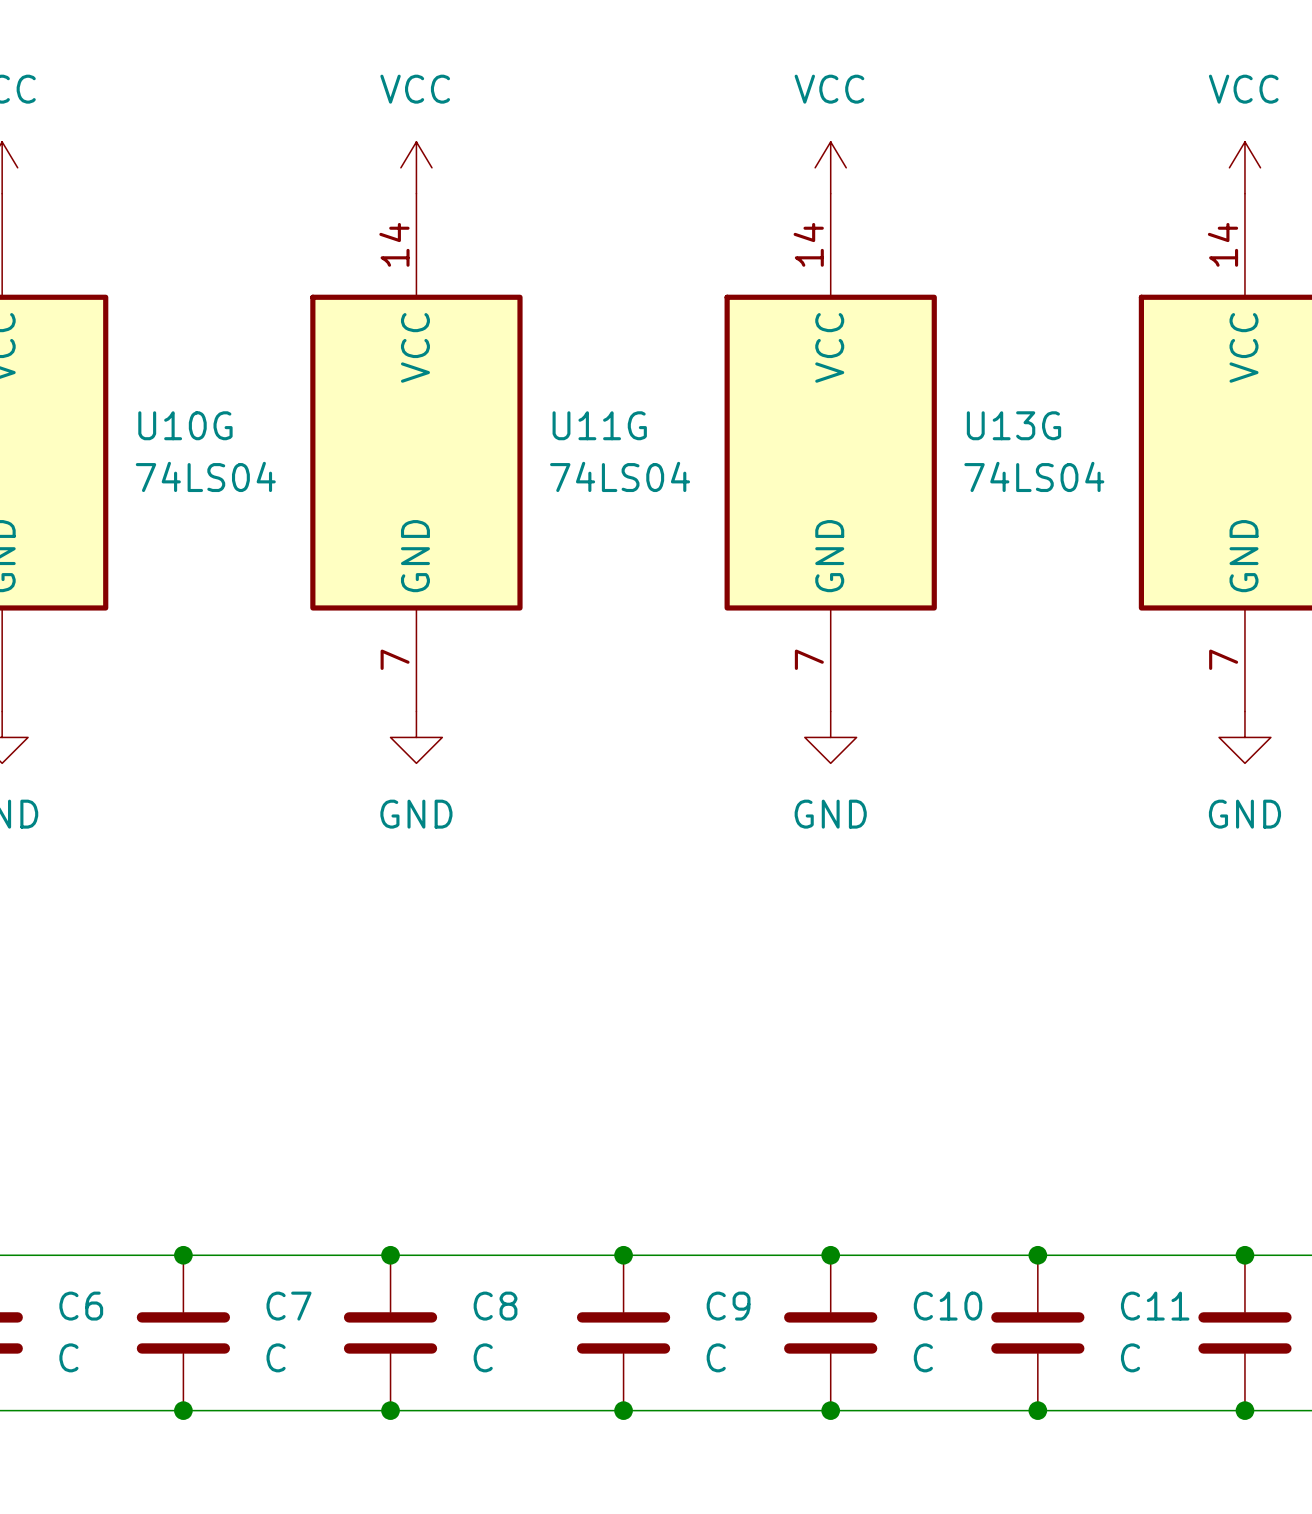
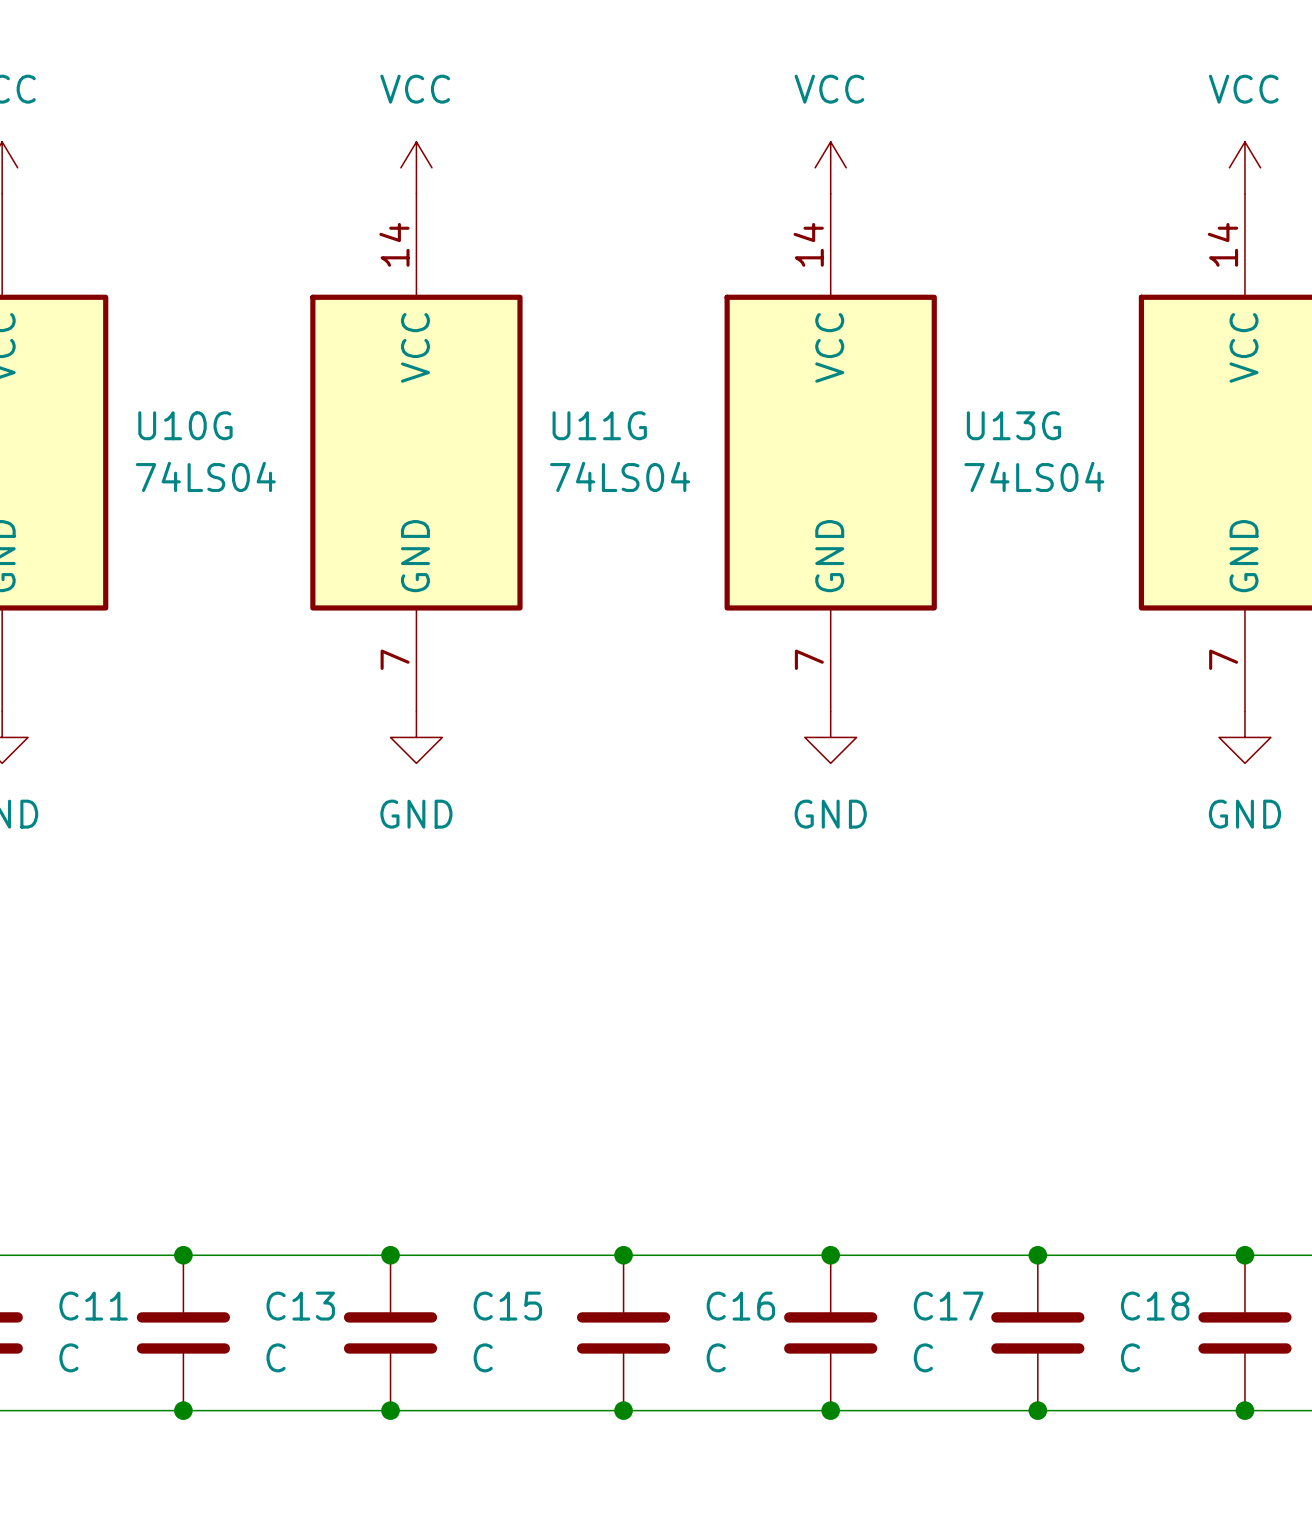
C6 name: C6 (81, 1306) -> C11 (93, 1306)
C7 name: C7 (289, 1306) -> C13 (300, 1306)
C8 name: C8 (495, 1306) -> C15 (507, 1306)
C9 name: C9 (728, 1306) -> C16 (740, 1306)
C10 name: C10 (948, 1306) -> C17 (948, 1306)
C11 name: C11 (1155, 1306) -> C18 (1155, 1306)

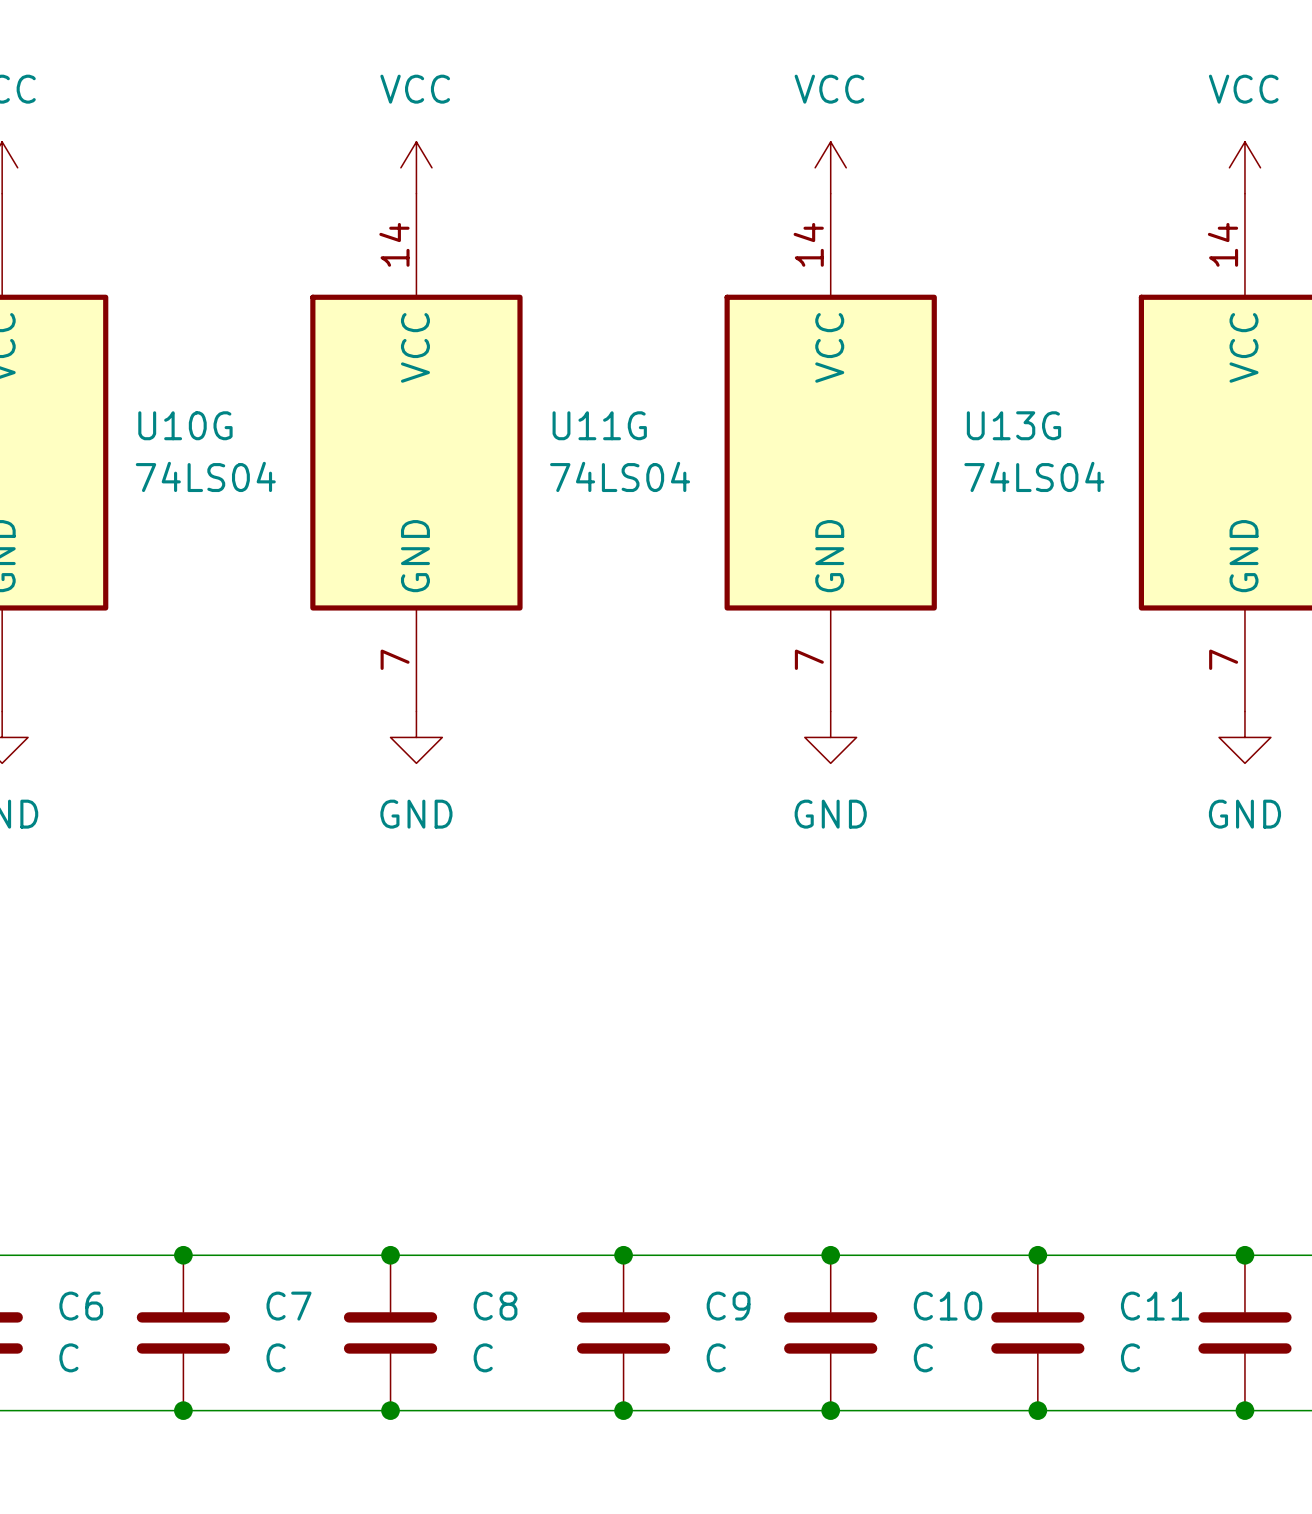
C11 name: C11 (93, 1306) -> C6 (81, 1306)
C13 name: C13 (300, 1306) -> C7 (289, 1306)
C15 name: C15 (507, 1306) -> C8 (495, 1306)
C16 name: C16 (740, 1306) -> C9 (728, 1306)
C17 name: C17 (948, 1306) -> C10 (948, 1306)
C18 name: C18 (1155, 1306) -> C11 (1155, 1306)

